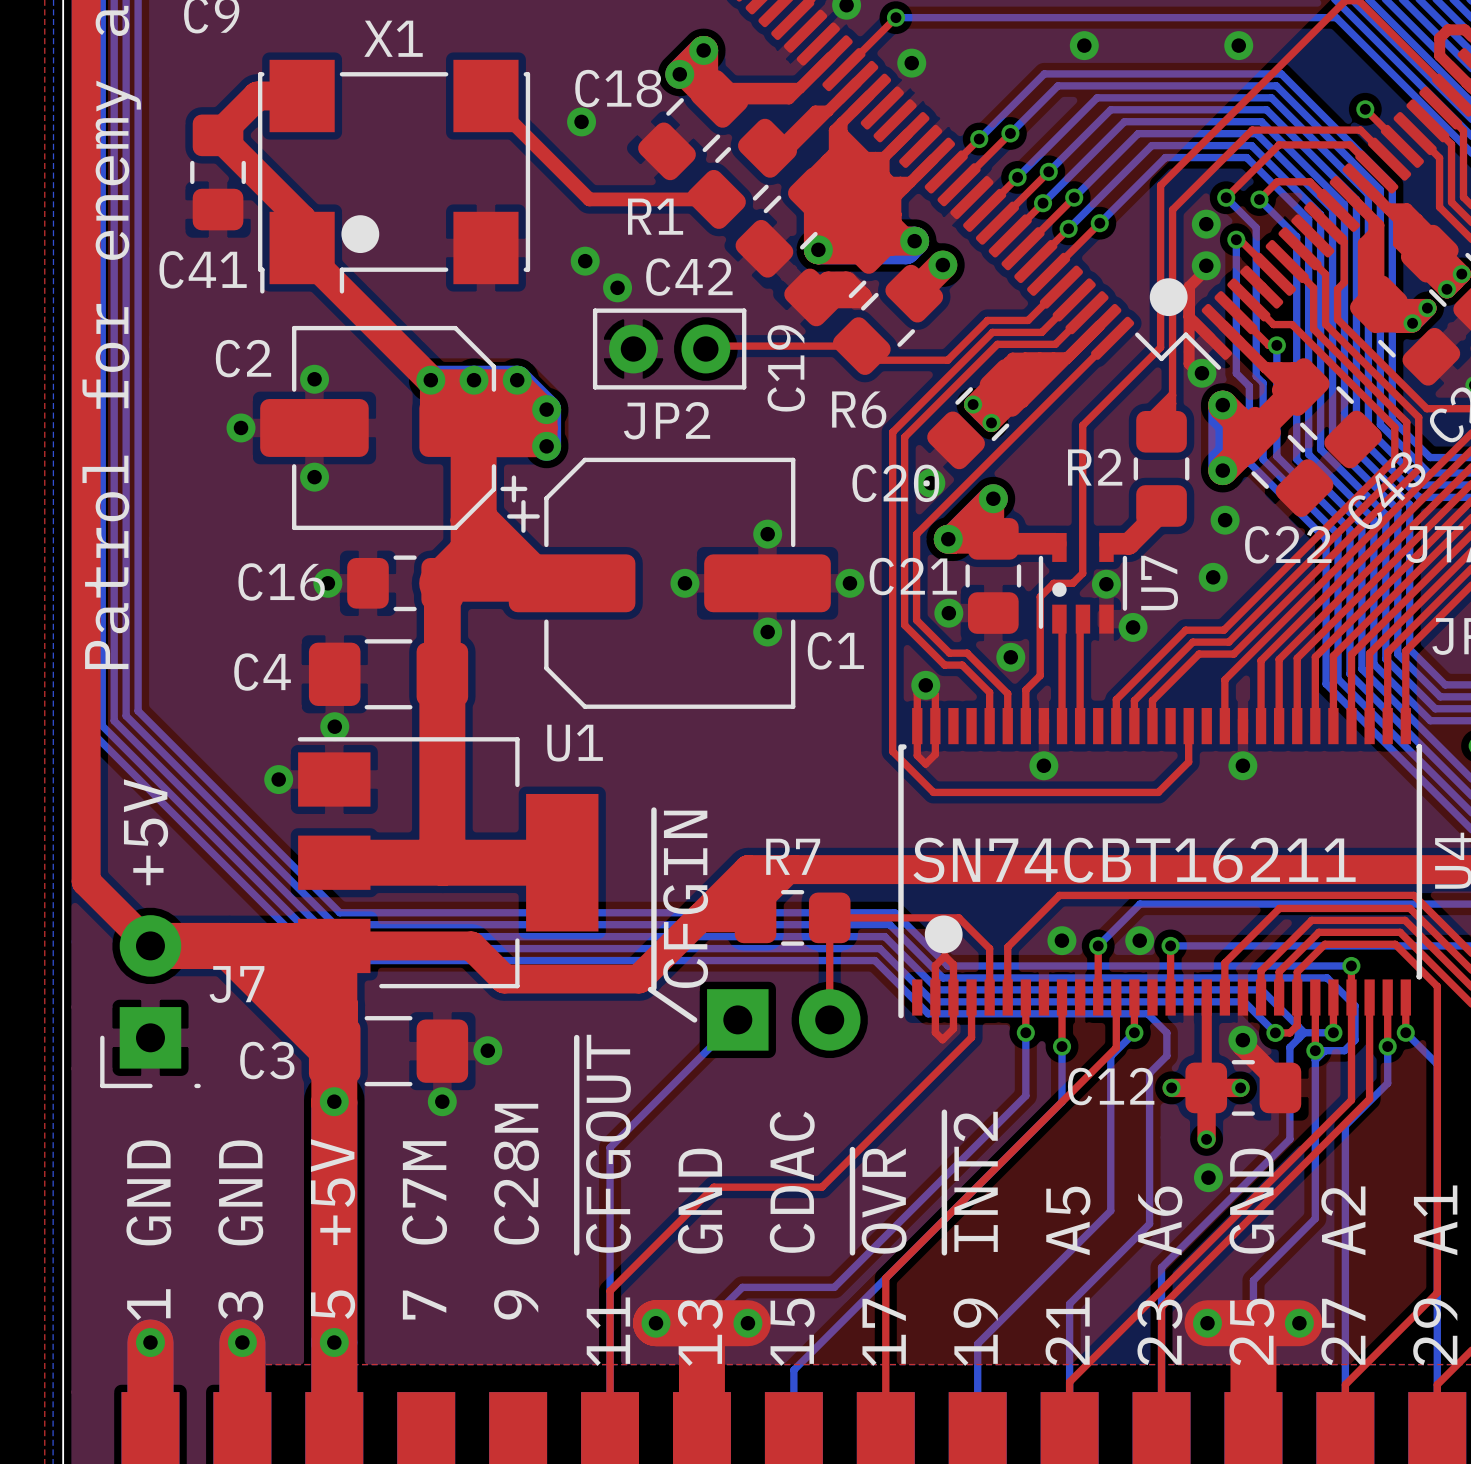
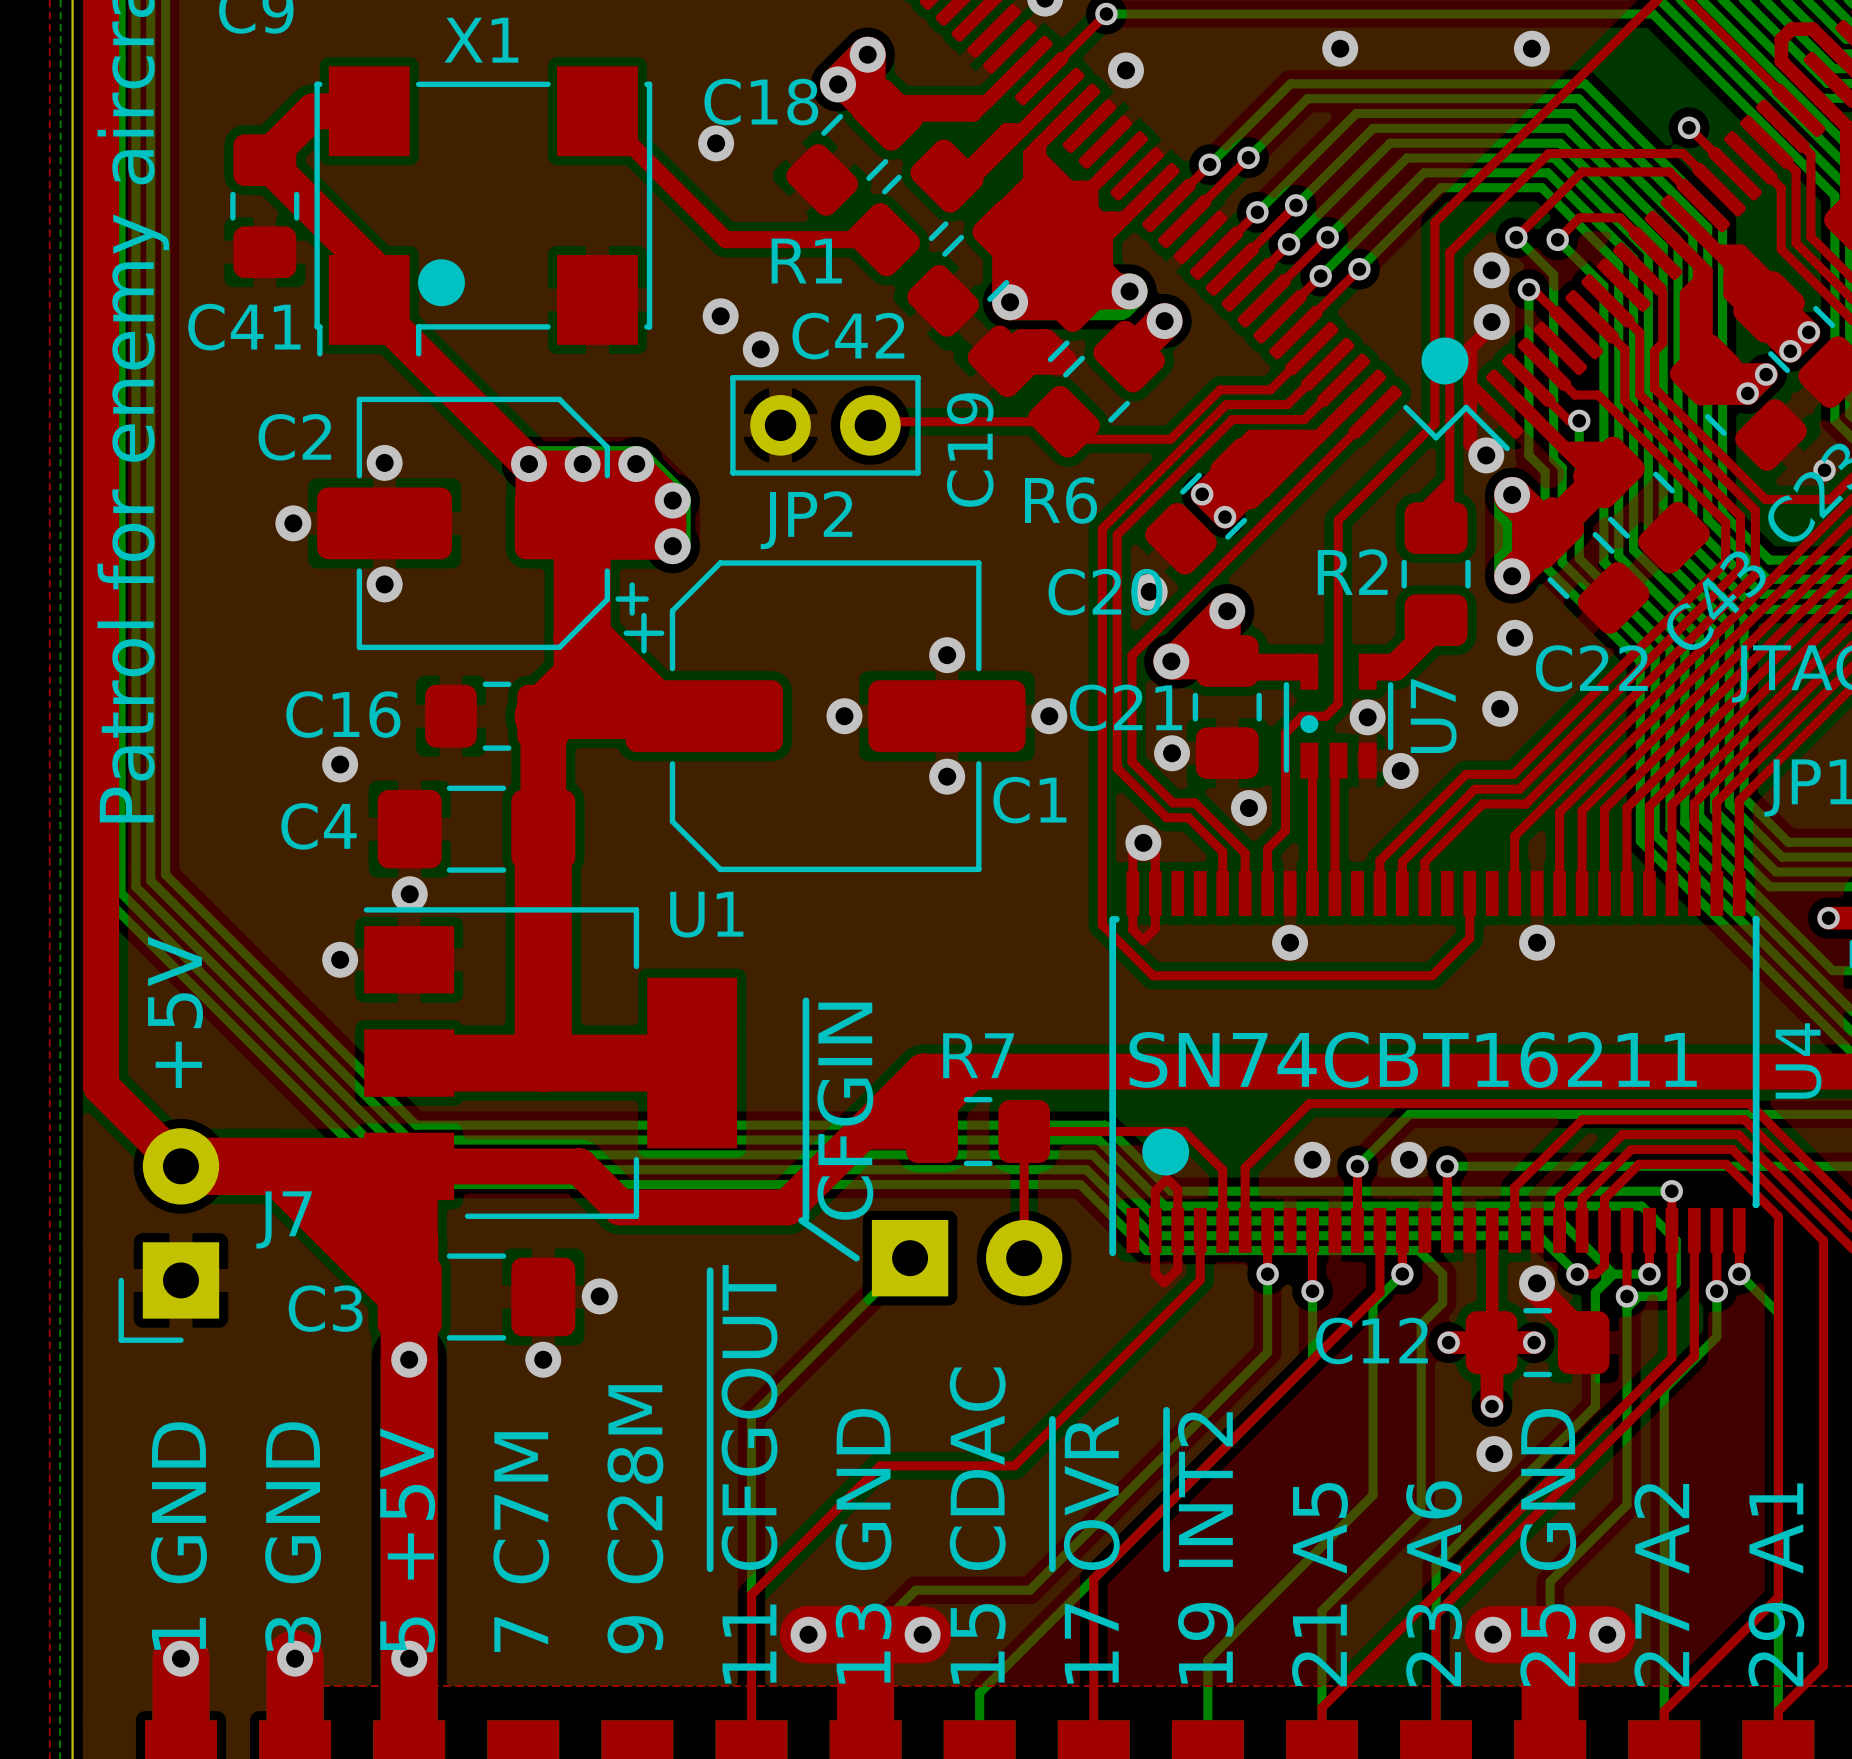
via position: (327, 583) -> (340, 764)
J7 footprint: [100, 915, 201, 1089] -> [118, 1128, 220, 1343]

